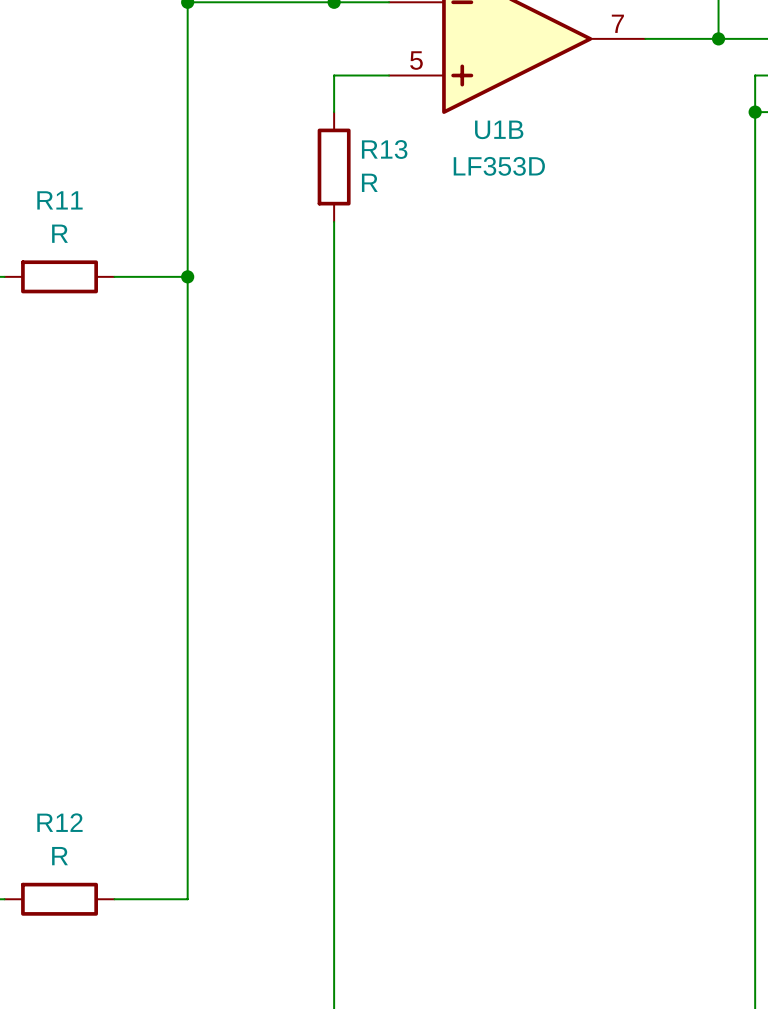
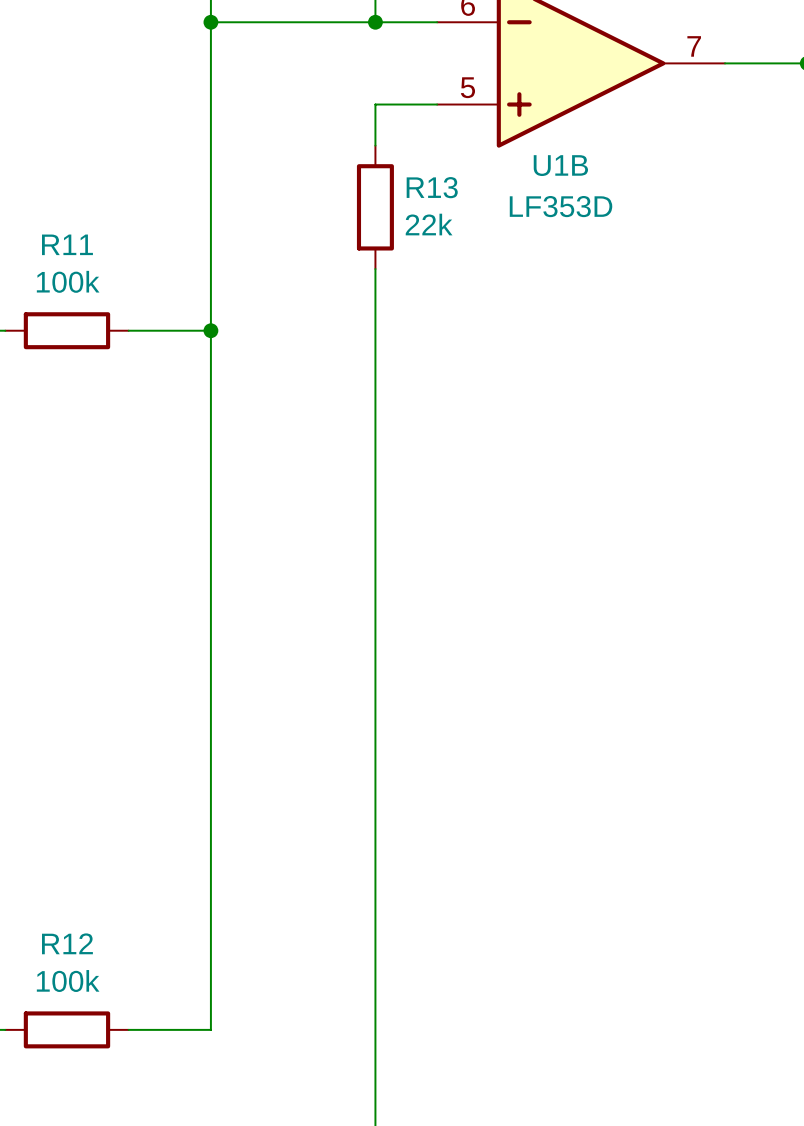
R13 value: R (369, 182) -> 22k (429, 224)
R11 value: R (60, 233) -> 100k (68, 281)
R12 value: R (60, 856) -> 100k (68, 981)

